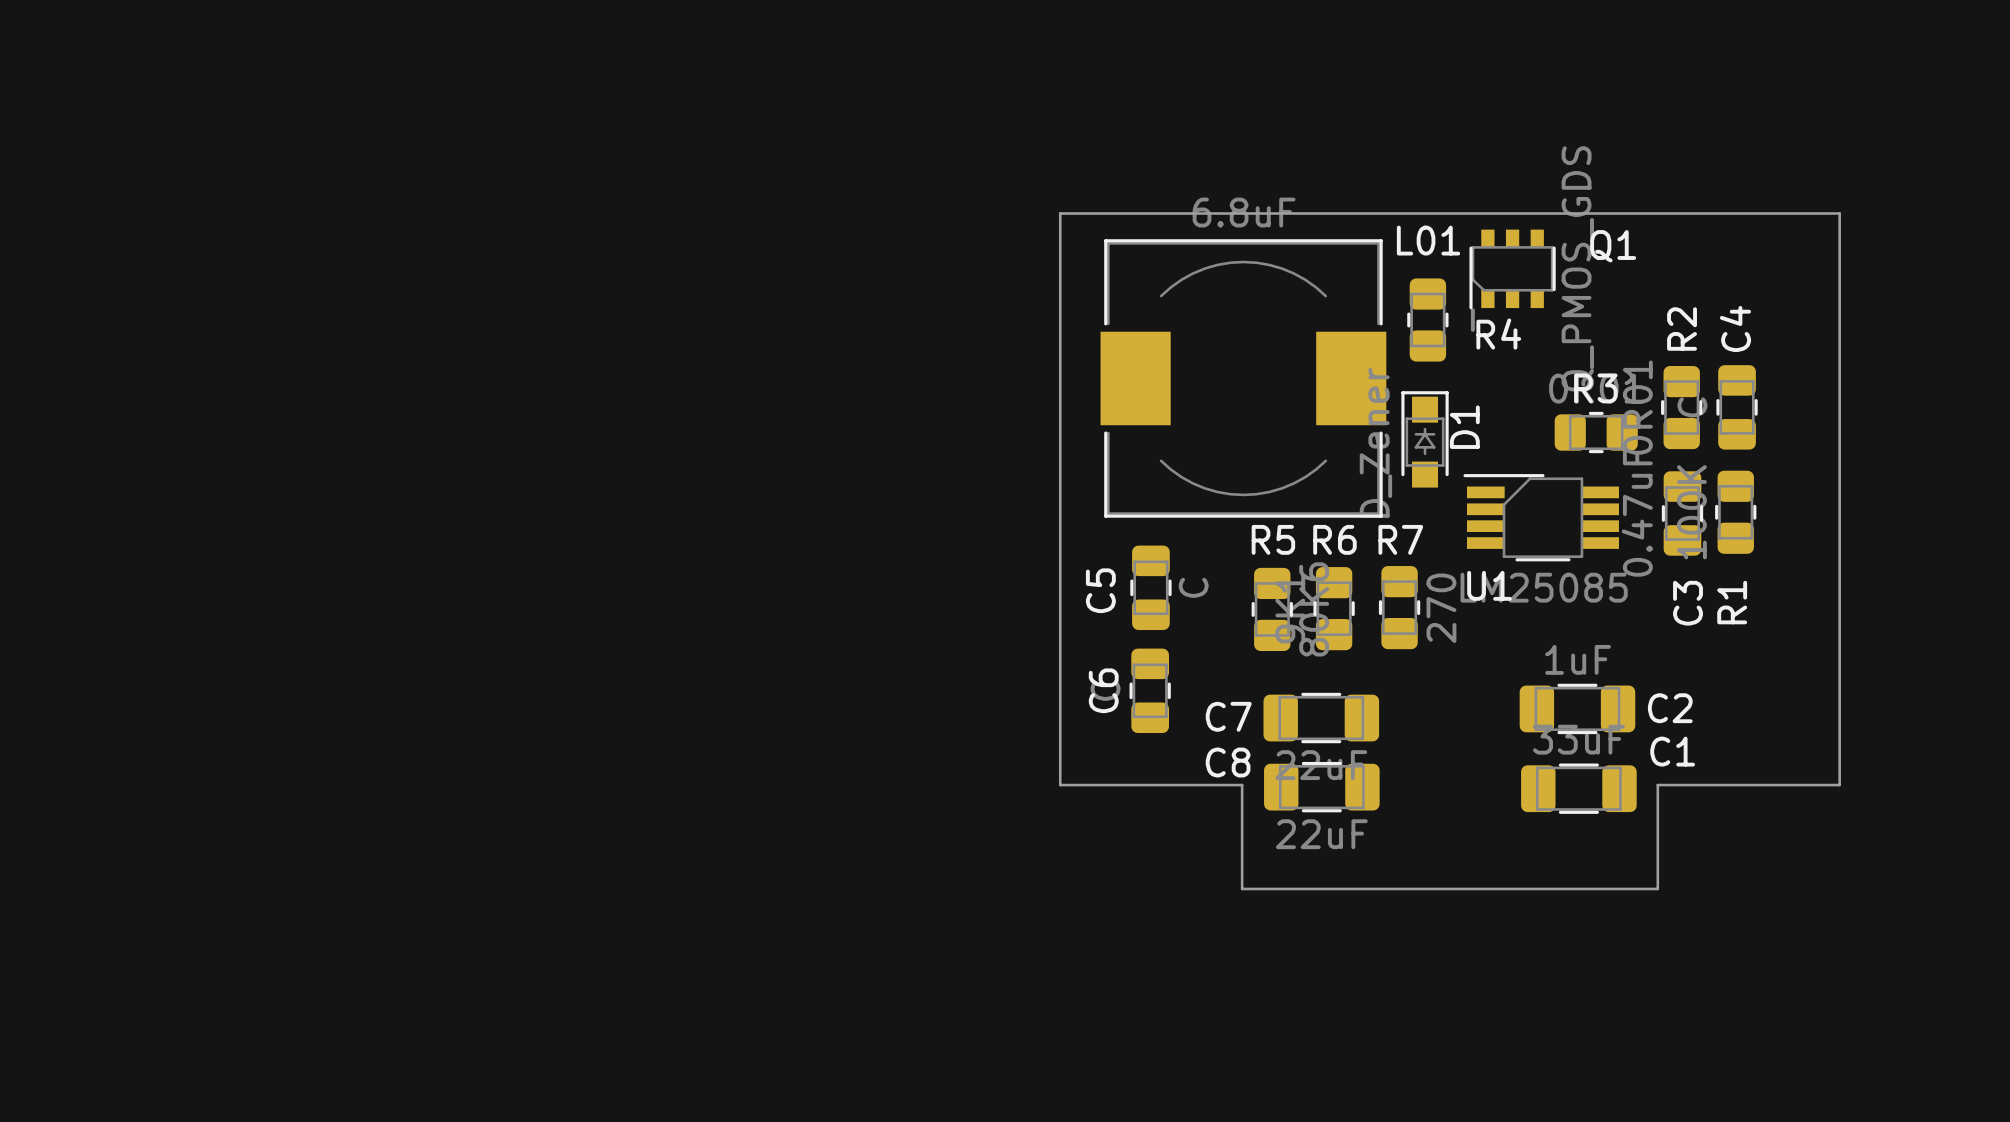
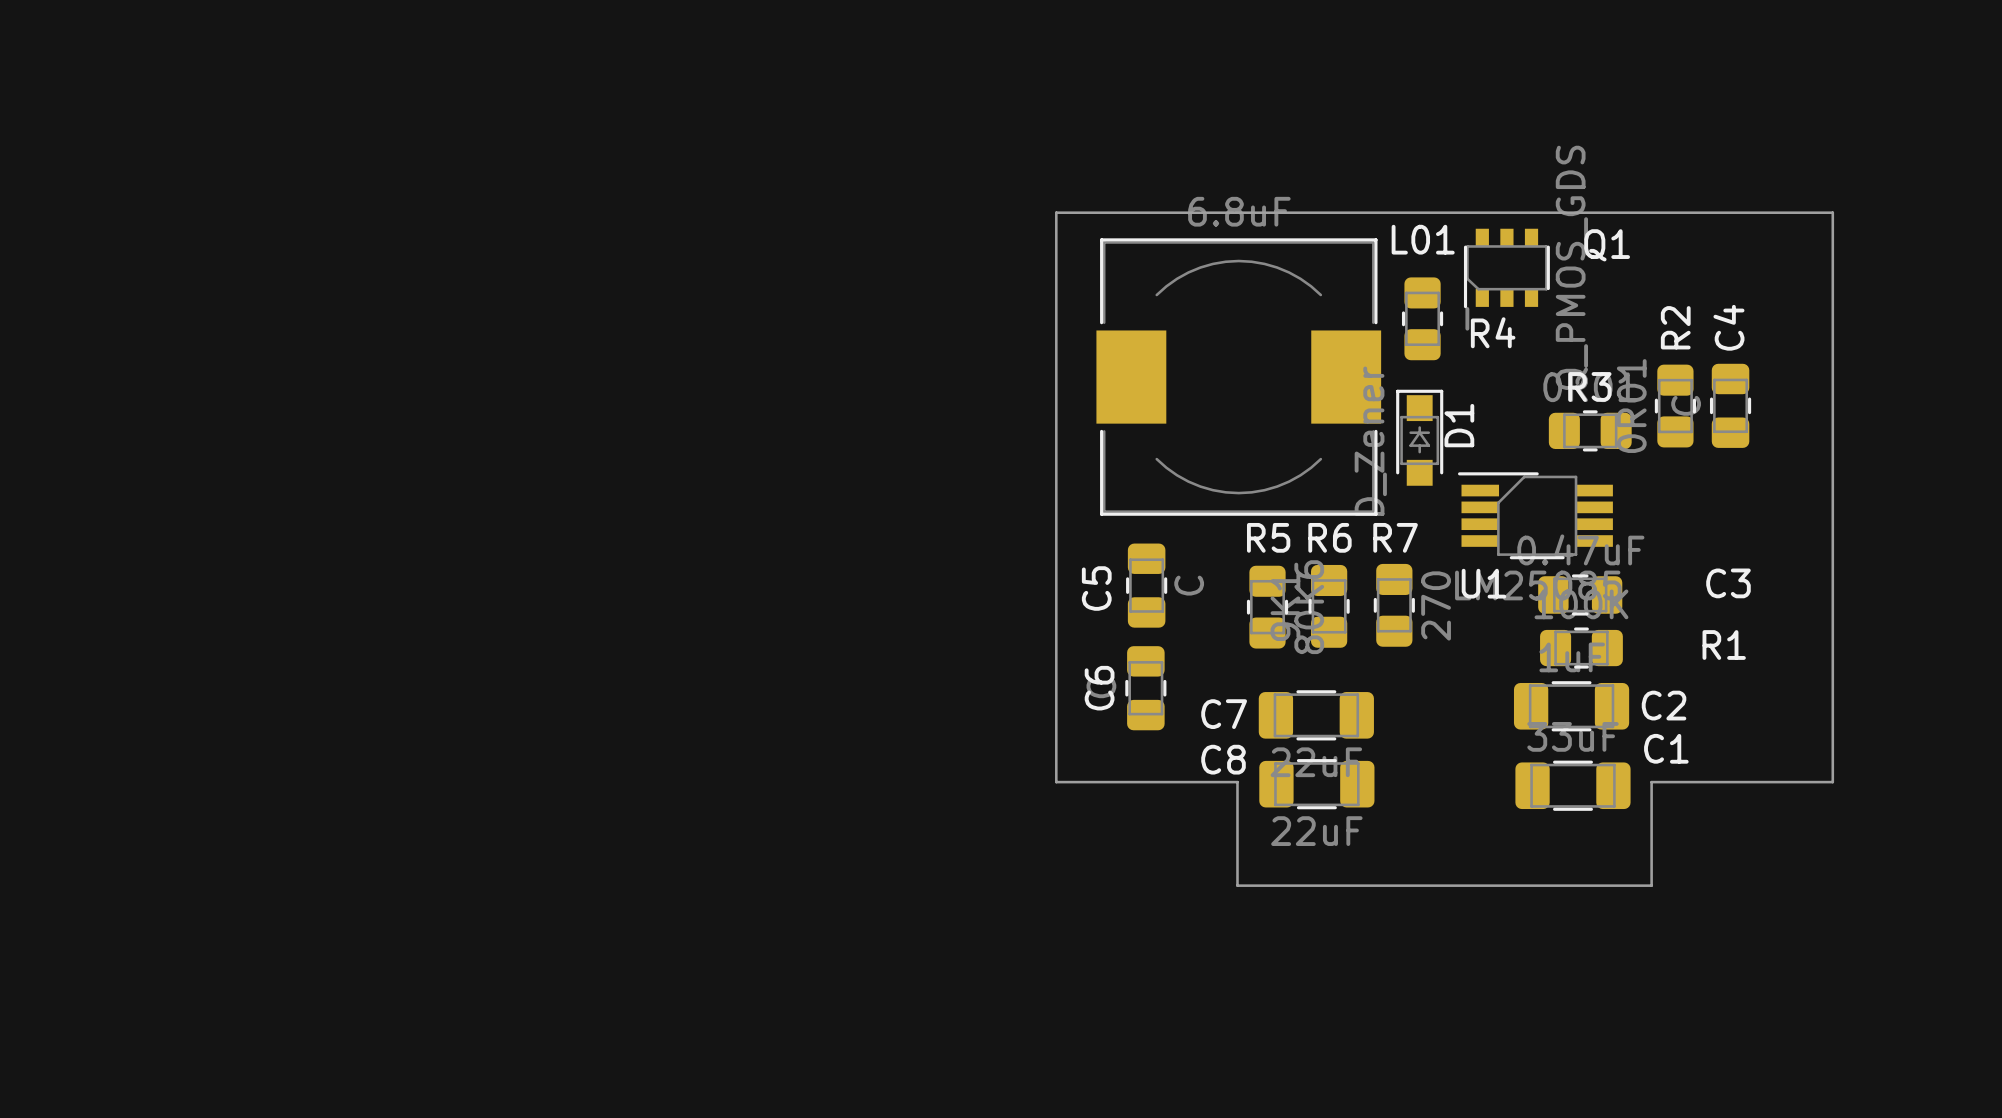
R1 rotation: 0° (1735, 512) -> 90° clockwise (1581, 648)
R1 position: (1735, 512) -> (1581, 648)
C3 rotation: 0° (1682, 513) -> 90° clockwise (1580, 594)
C3 position: (1682, 513) -> (1580, 594)
R1 name position: R1 (1732, 602) -> R1 (1724, 645)
C3 name position: C3 (1688, 603) -> C3 (1728, 583)

